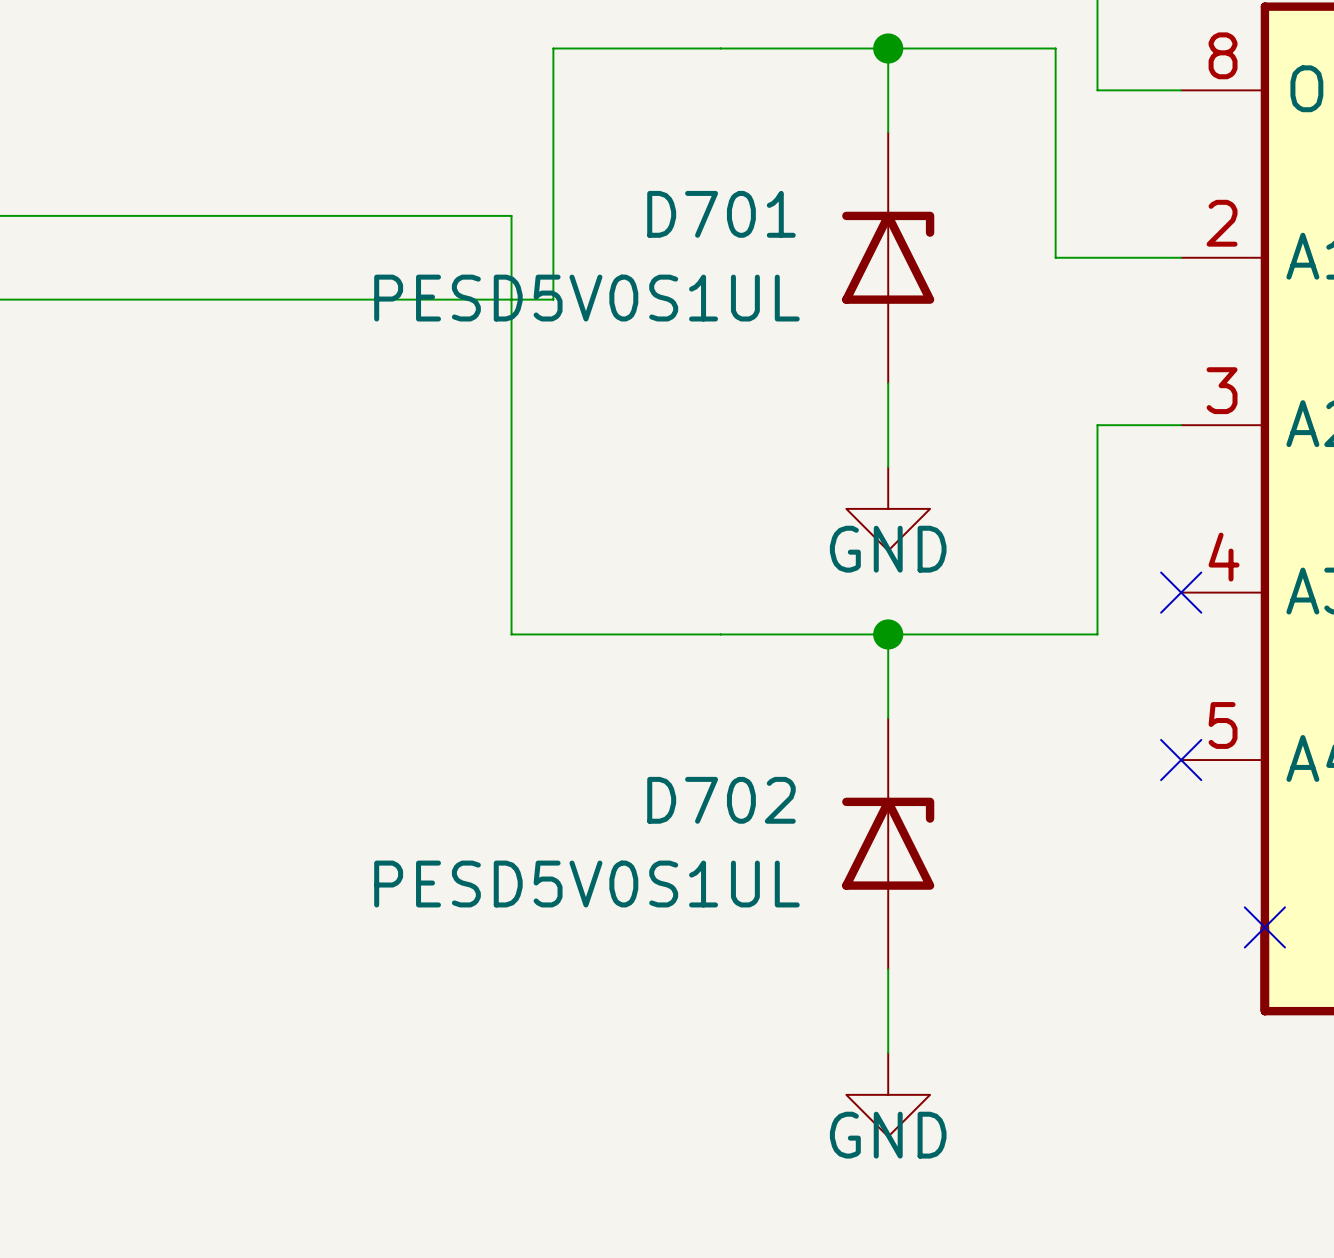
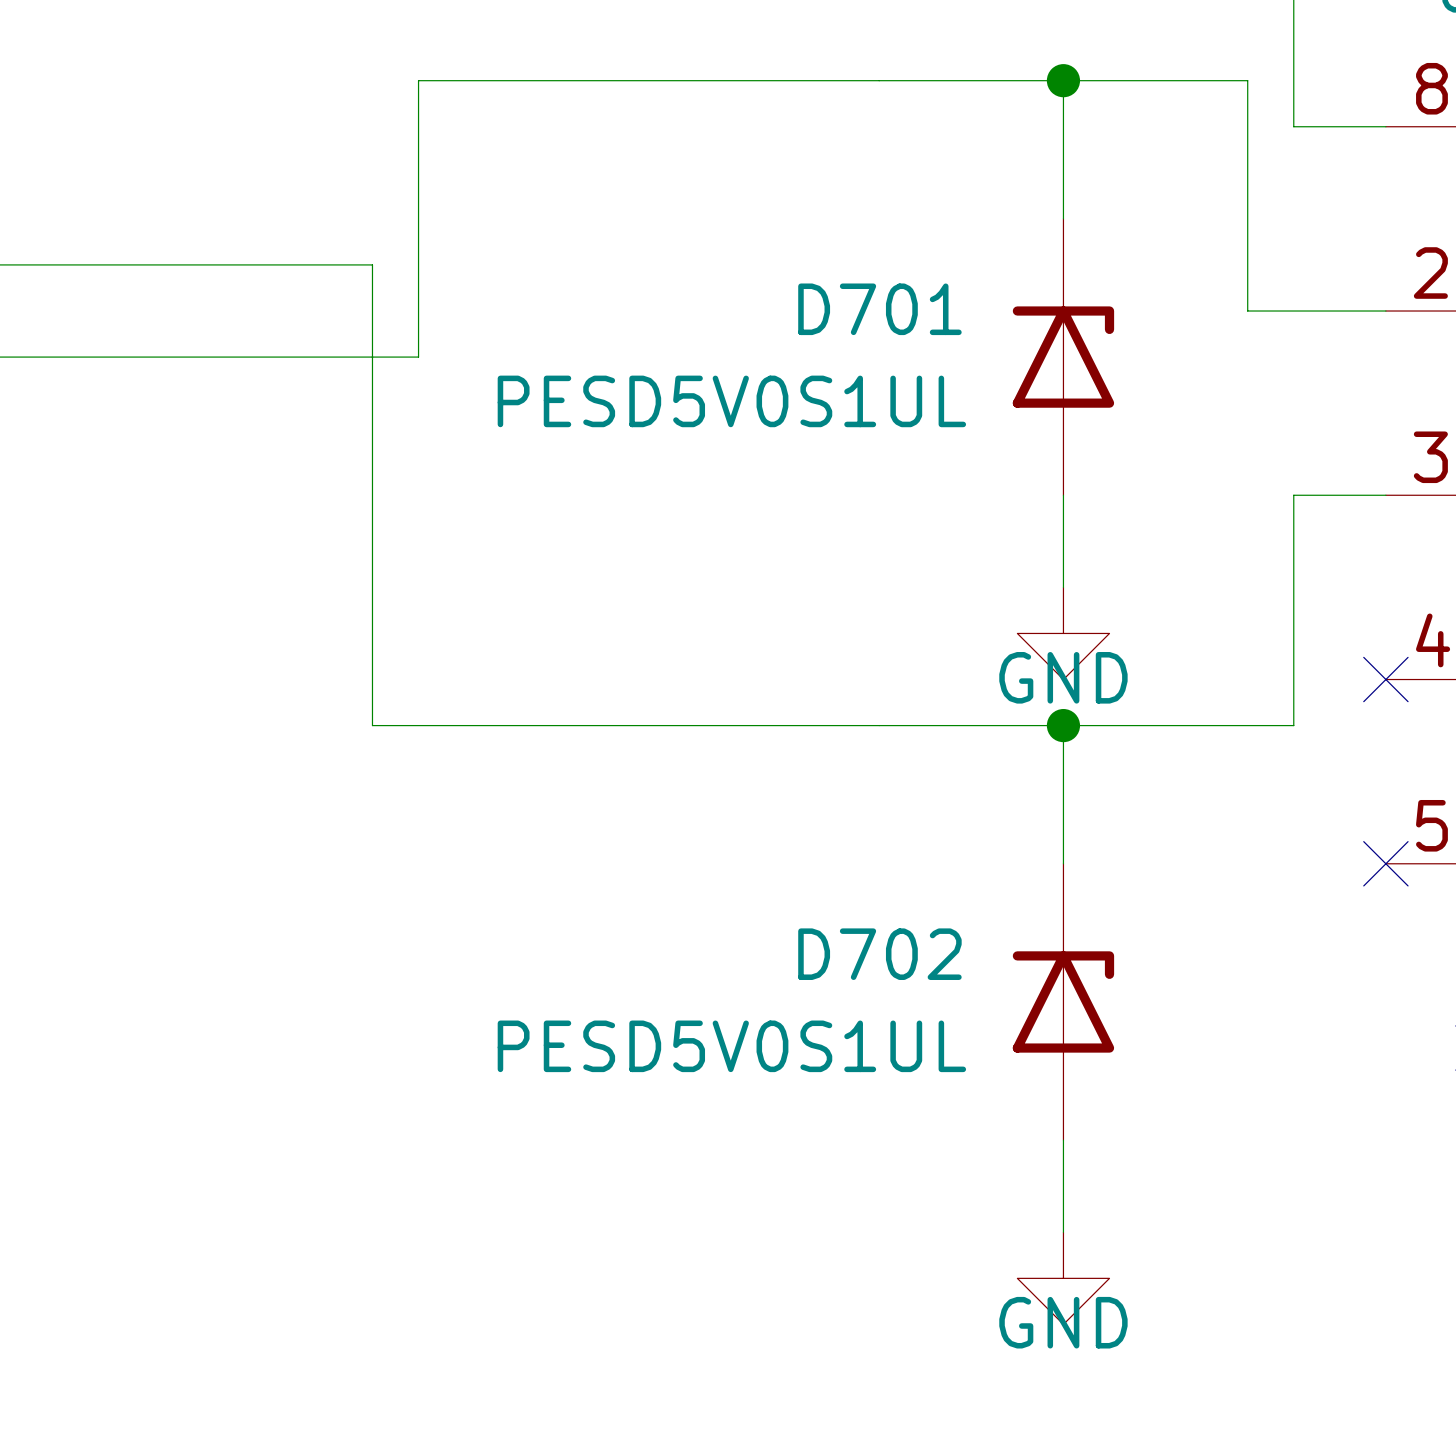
wire: (553, 48) (553, 299) (302, 299) -> (694, 80) (418, 80) (418, 357)
wire: (260, 215) (511, 215) (511, 634) -> (372, 264) (372, 725) (648, 725)
D701 position: (888, 257) -> (1063, 357)
power symbol position: GND (888, 508) -> GND (1063, 633)
D702 position: (888, 843) -> (1063, 1001)
power symbol position: GND (888, 1094) -> GND (1063, 1278)

